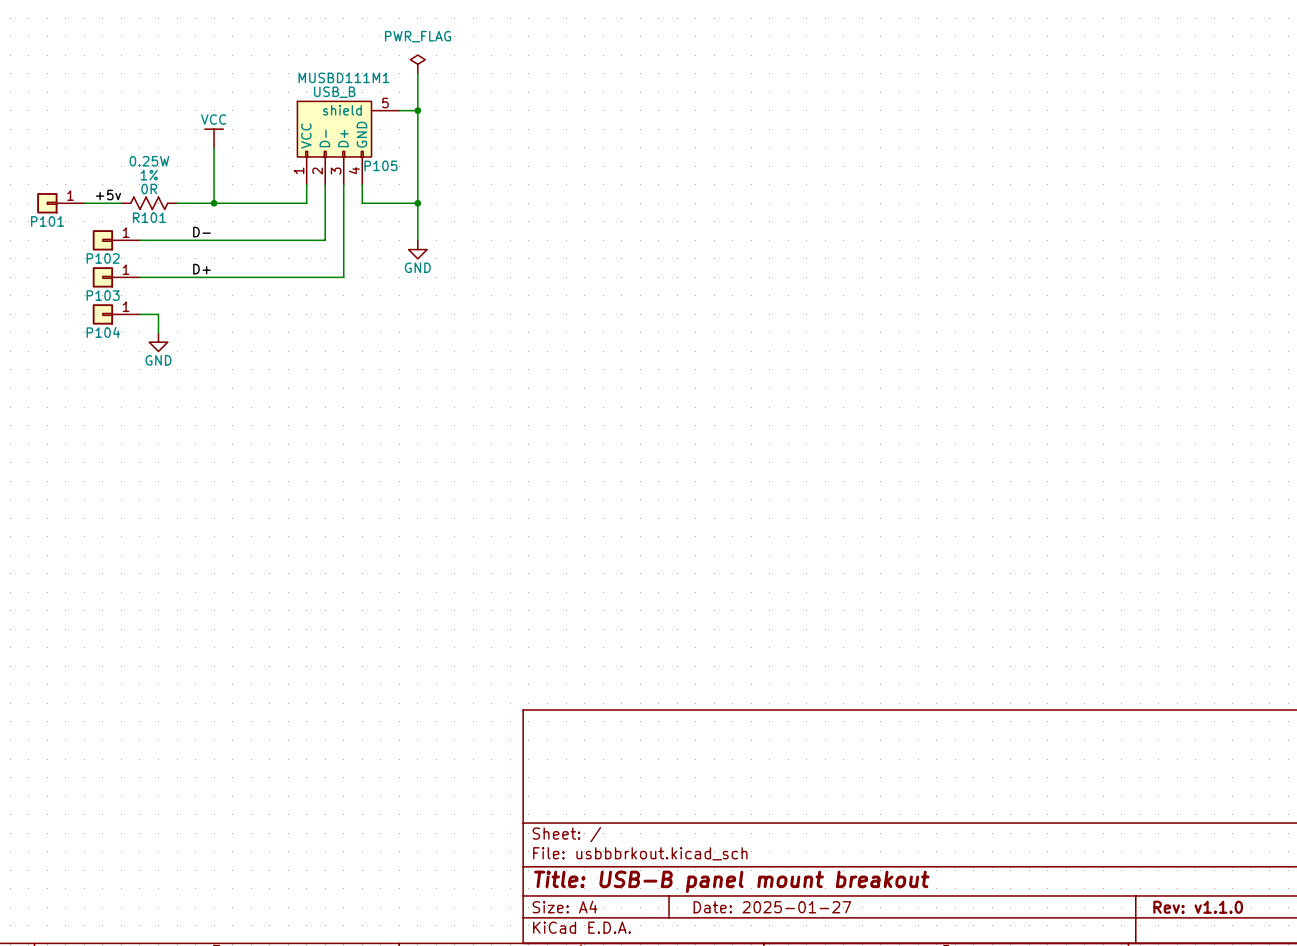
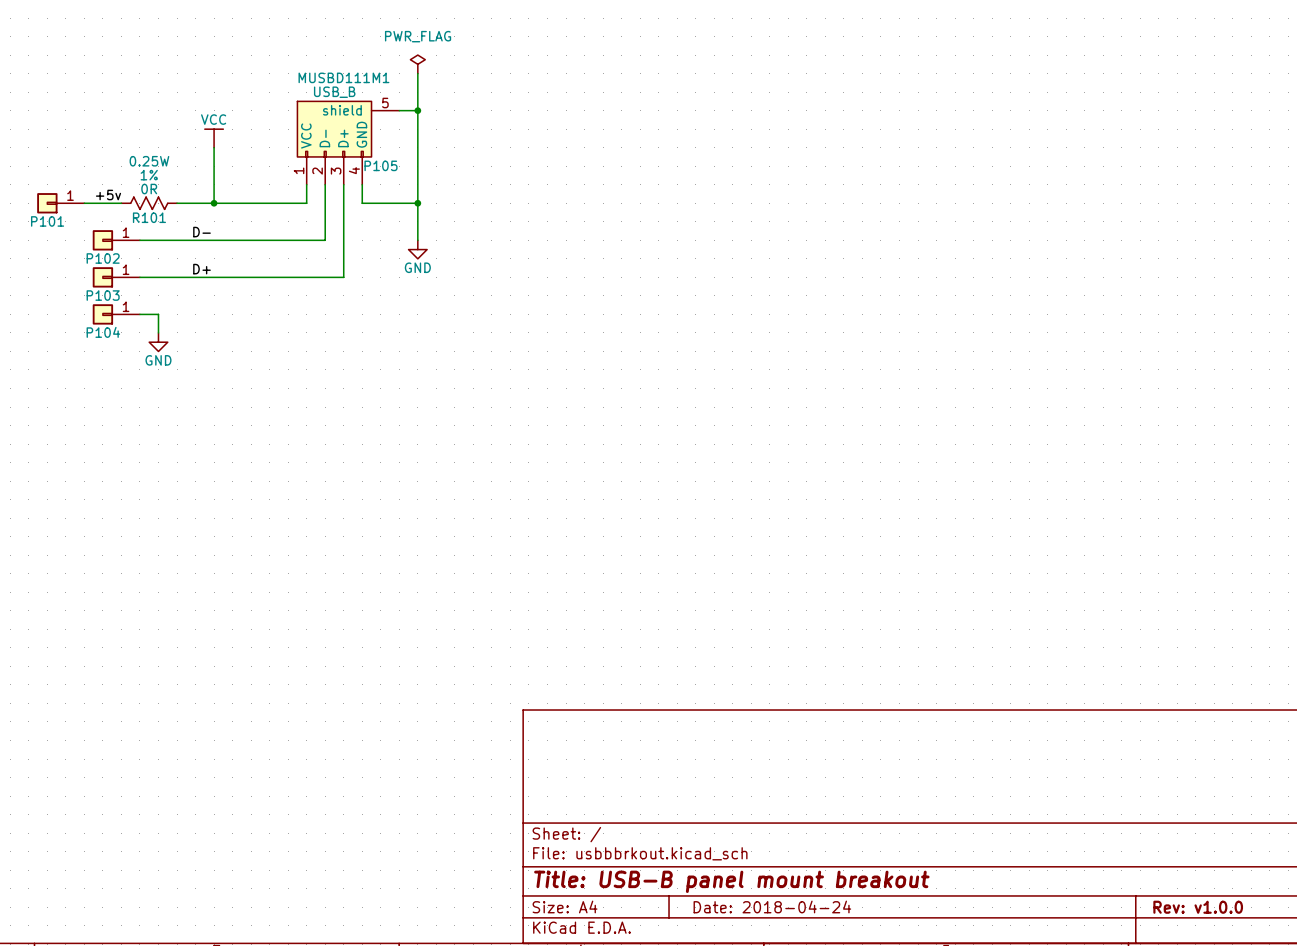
title block: Date: 2025-01-27 (772, 907) -> Date: 2018-04-24 (772, 906)
title block: Rev: v1.1.0 (1198, 907) -> Rev: v1.0.0 (1198, 907)

